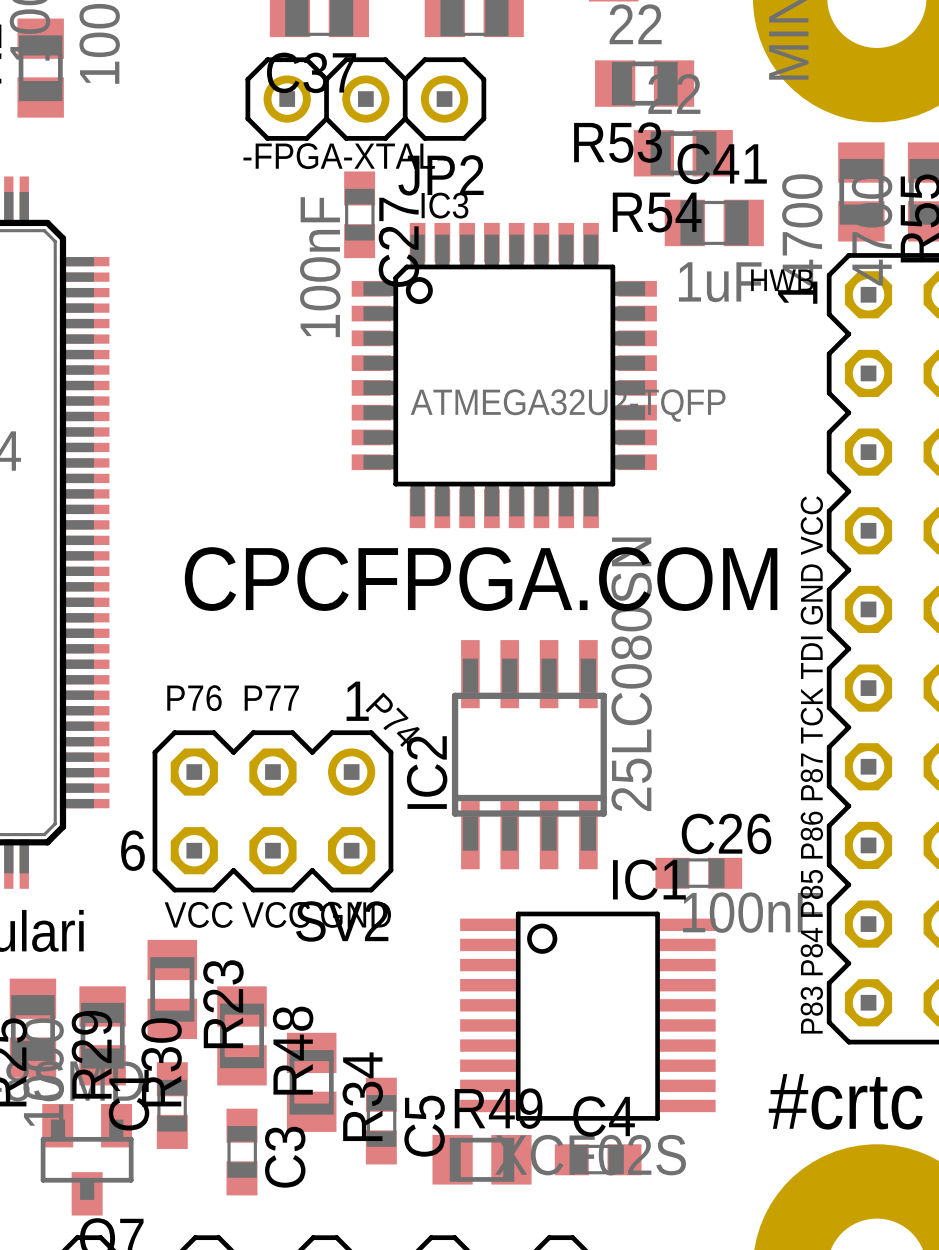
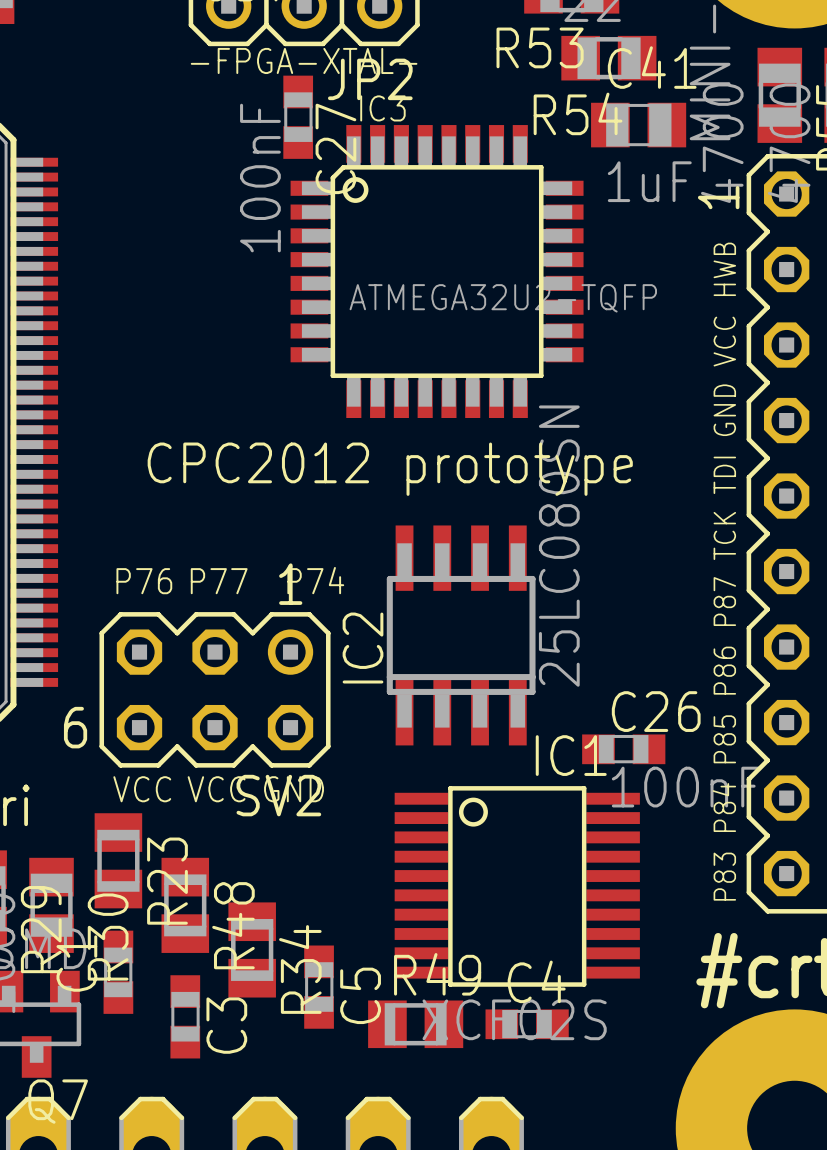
text: HWB (782, 280) -> none
text: CPCFPGA.COM (481, 579) -> none
text: none -> CPC2012 prototype (390, 469)
text rotation: 0° (392, 719) -> 45° counterclockwise (315, 580)
text: P83 P84 P85 P86 P87 TCK TDI GND VCC (811, 764) -> P83 P84 P85 P86 P87 TCK TDI GND VCC HWB (724, 571)

